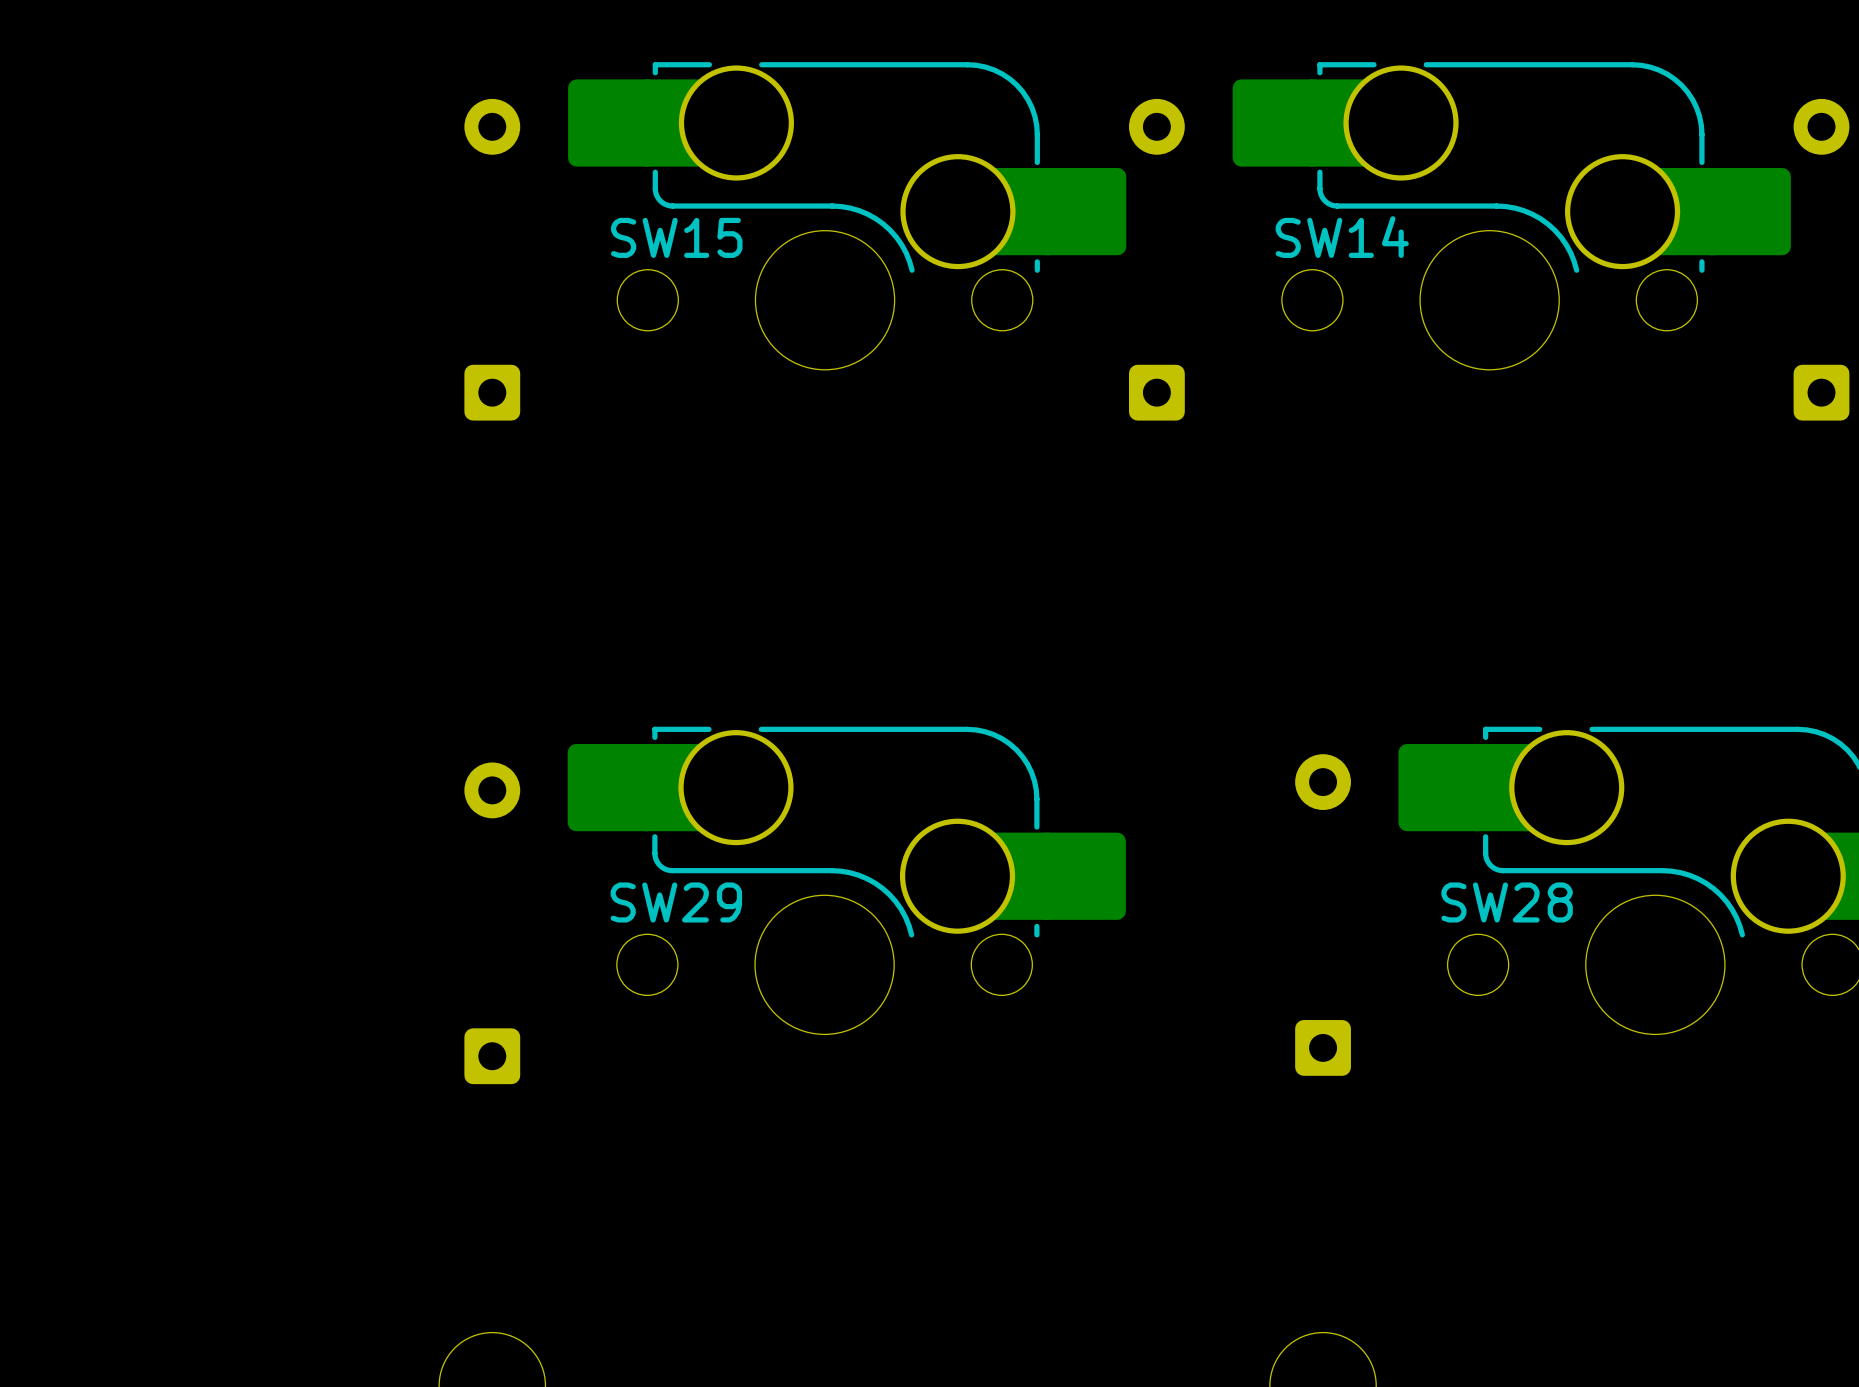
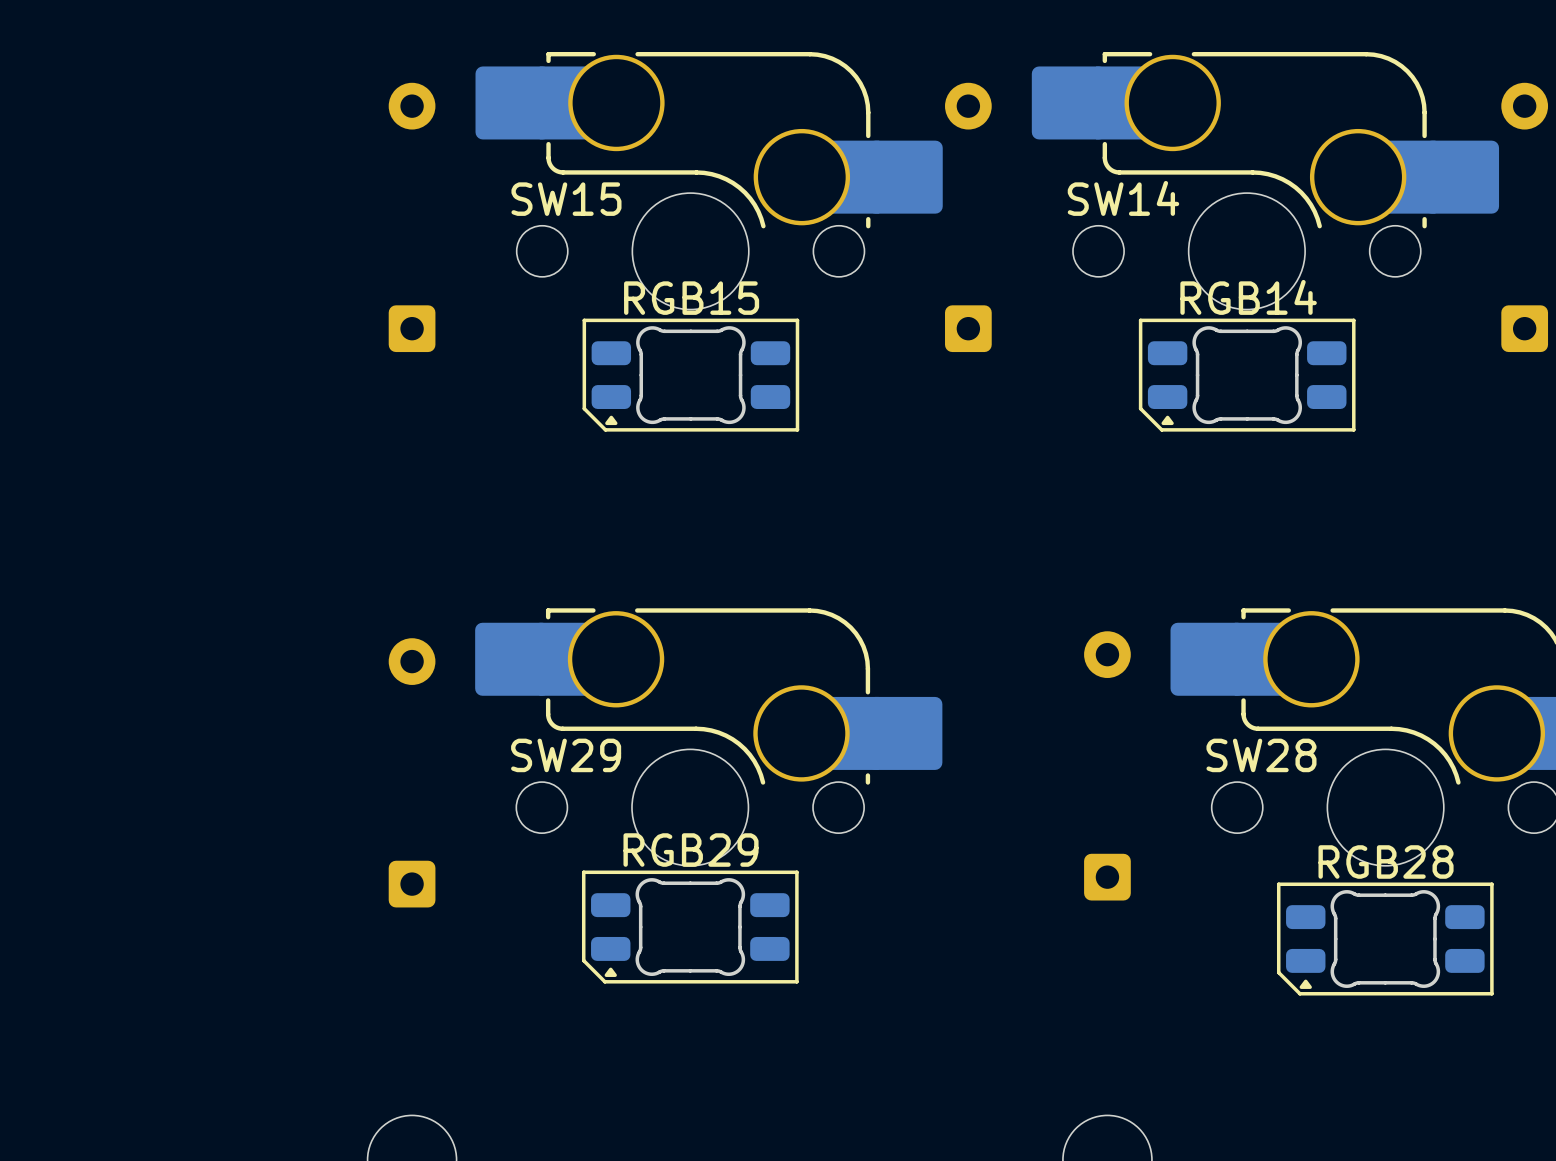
RGB15: none -> (690, 375)
RGB14: none -> (1247, 375)
RGB29: none -> (690, 927)
RGB28: none -> (1385, 939)

